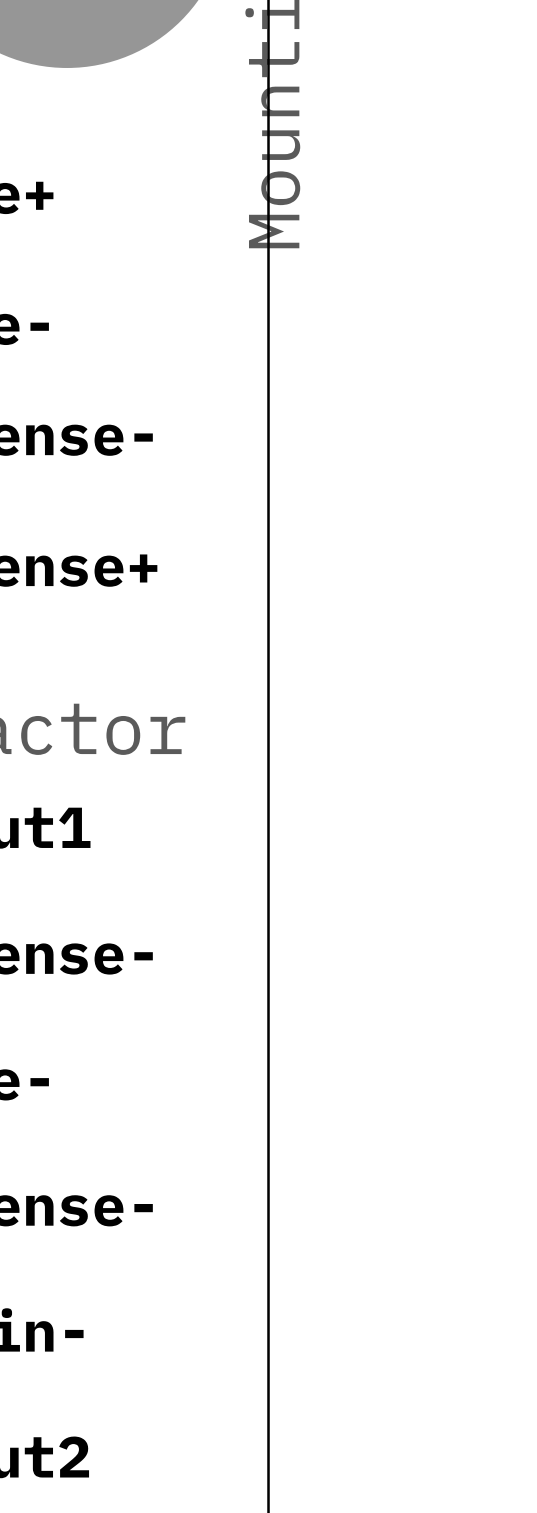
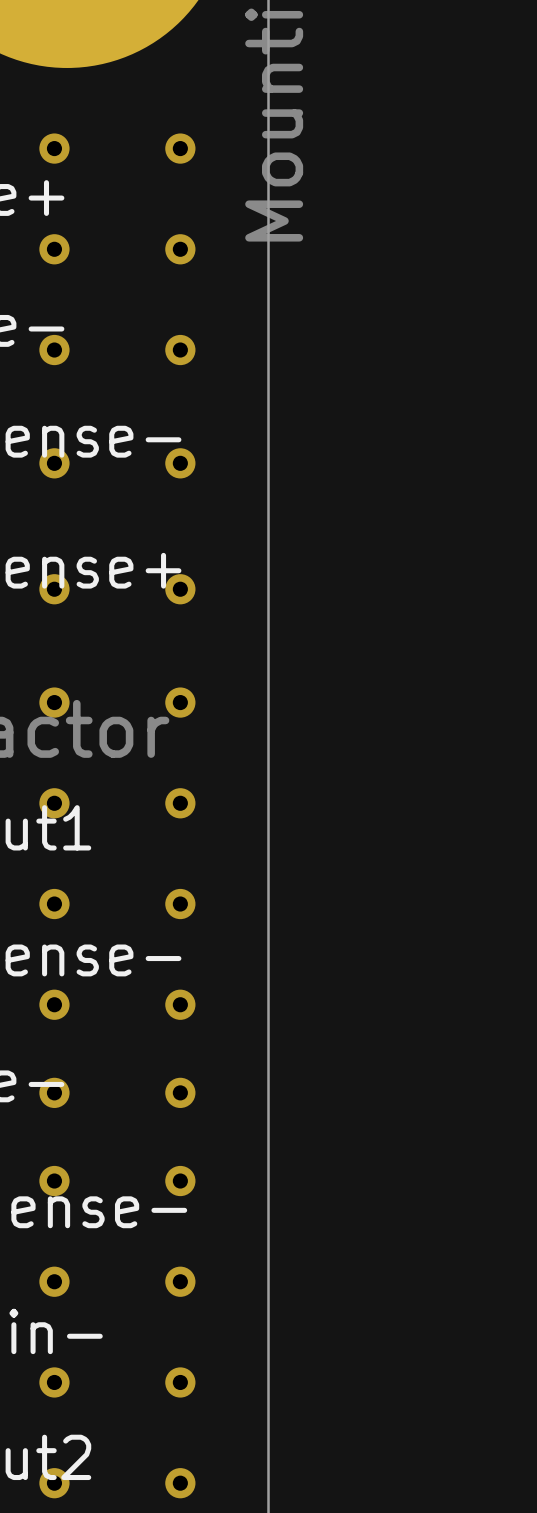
via: none -> (54, 148)
via: none -> (180, 148)
via: none -> (54, 249)
via: none -> (180, 249)
via: none -> (54, 350)
via: none -> (180, 350)
via: none -> (54, 463)
via: none -> (180, 463)
via: none -> (54, 589)
via: none -> (180, 589)
via: none -> (54, 702)
via: none -> (180, 702)
via: none -> (54, 803)
via: none -> (180, 803)
via: none -> (54, 904)
via: none -> (180, 904)
via: none -> (54, 1004)
via: none -> (180, 1004)
via: none -> (54, 1092)
via: none -> (180, 1092)
via: none -> (54, 1181)
via: none -> (180, 1181)
via: none -> (54, 1281)
via: none -> (180, 1281)
via: none -> (54, 1382)
via: none -> (180, 1382)
via: none -> (54, 1483)
via: none -> (180, 1483)

